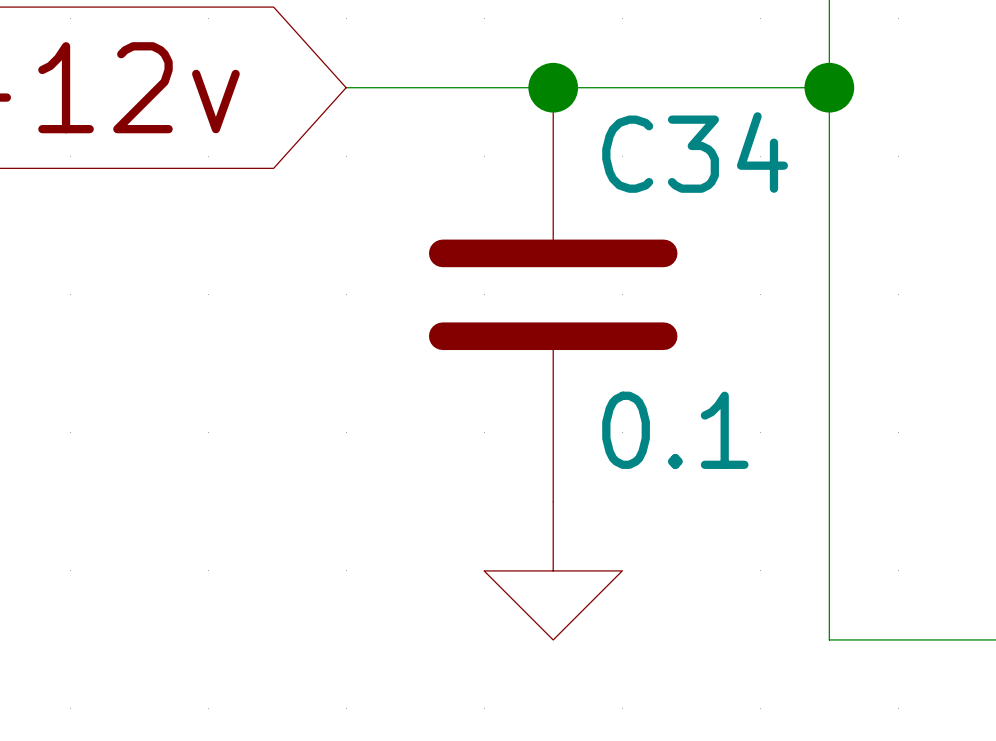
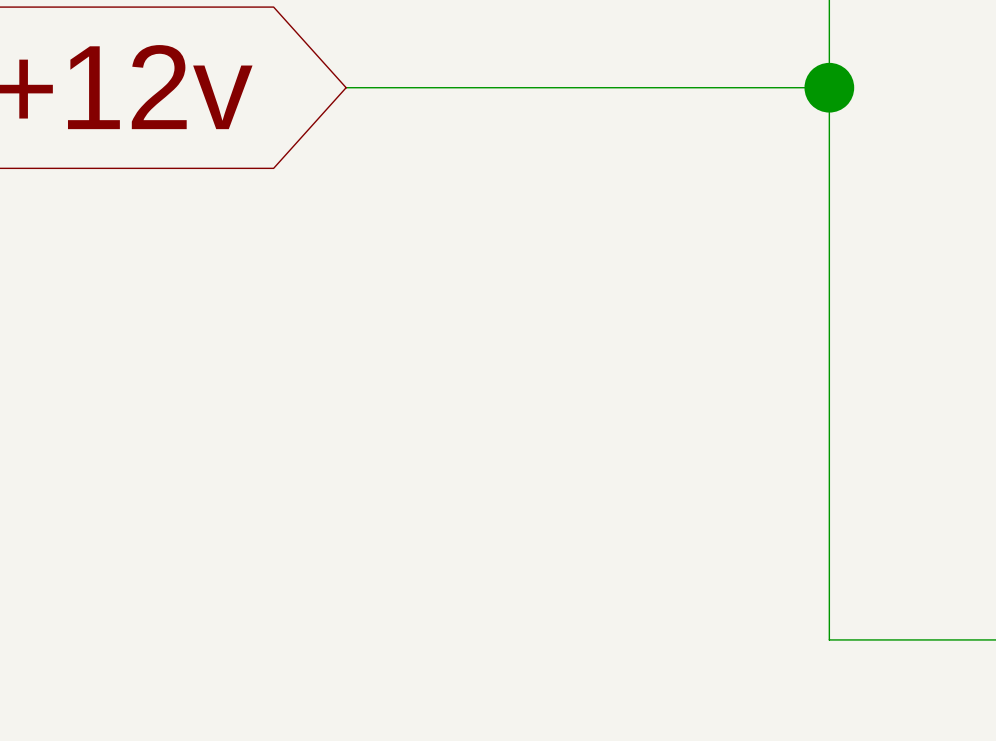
junction: (553, 87) -> none
C34: 0.1 (553, 294) -> none
power symbol: (553, 570) -> none

